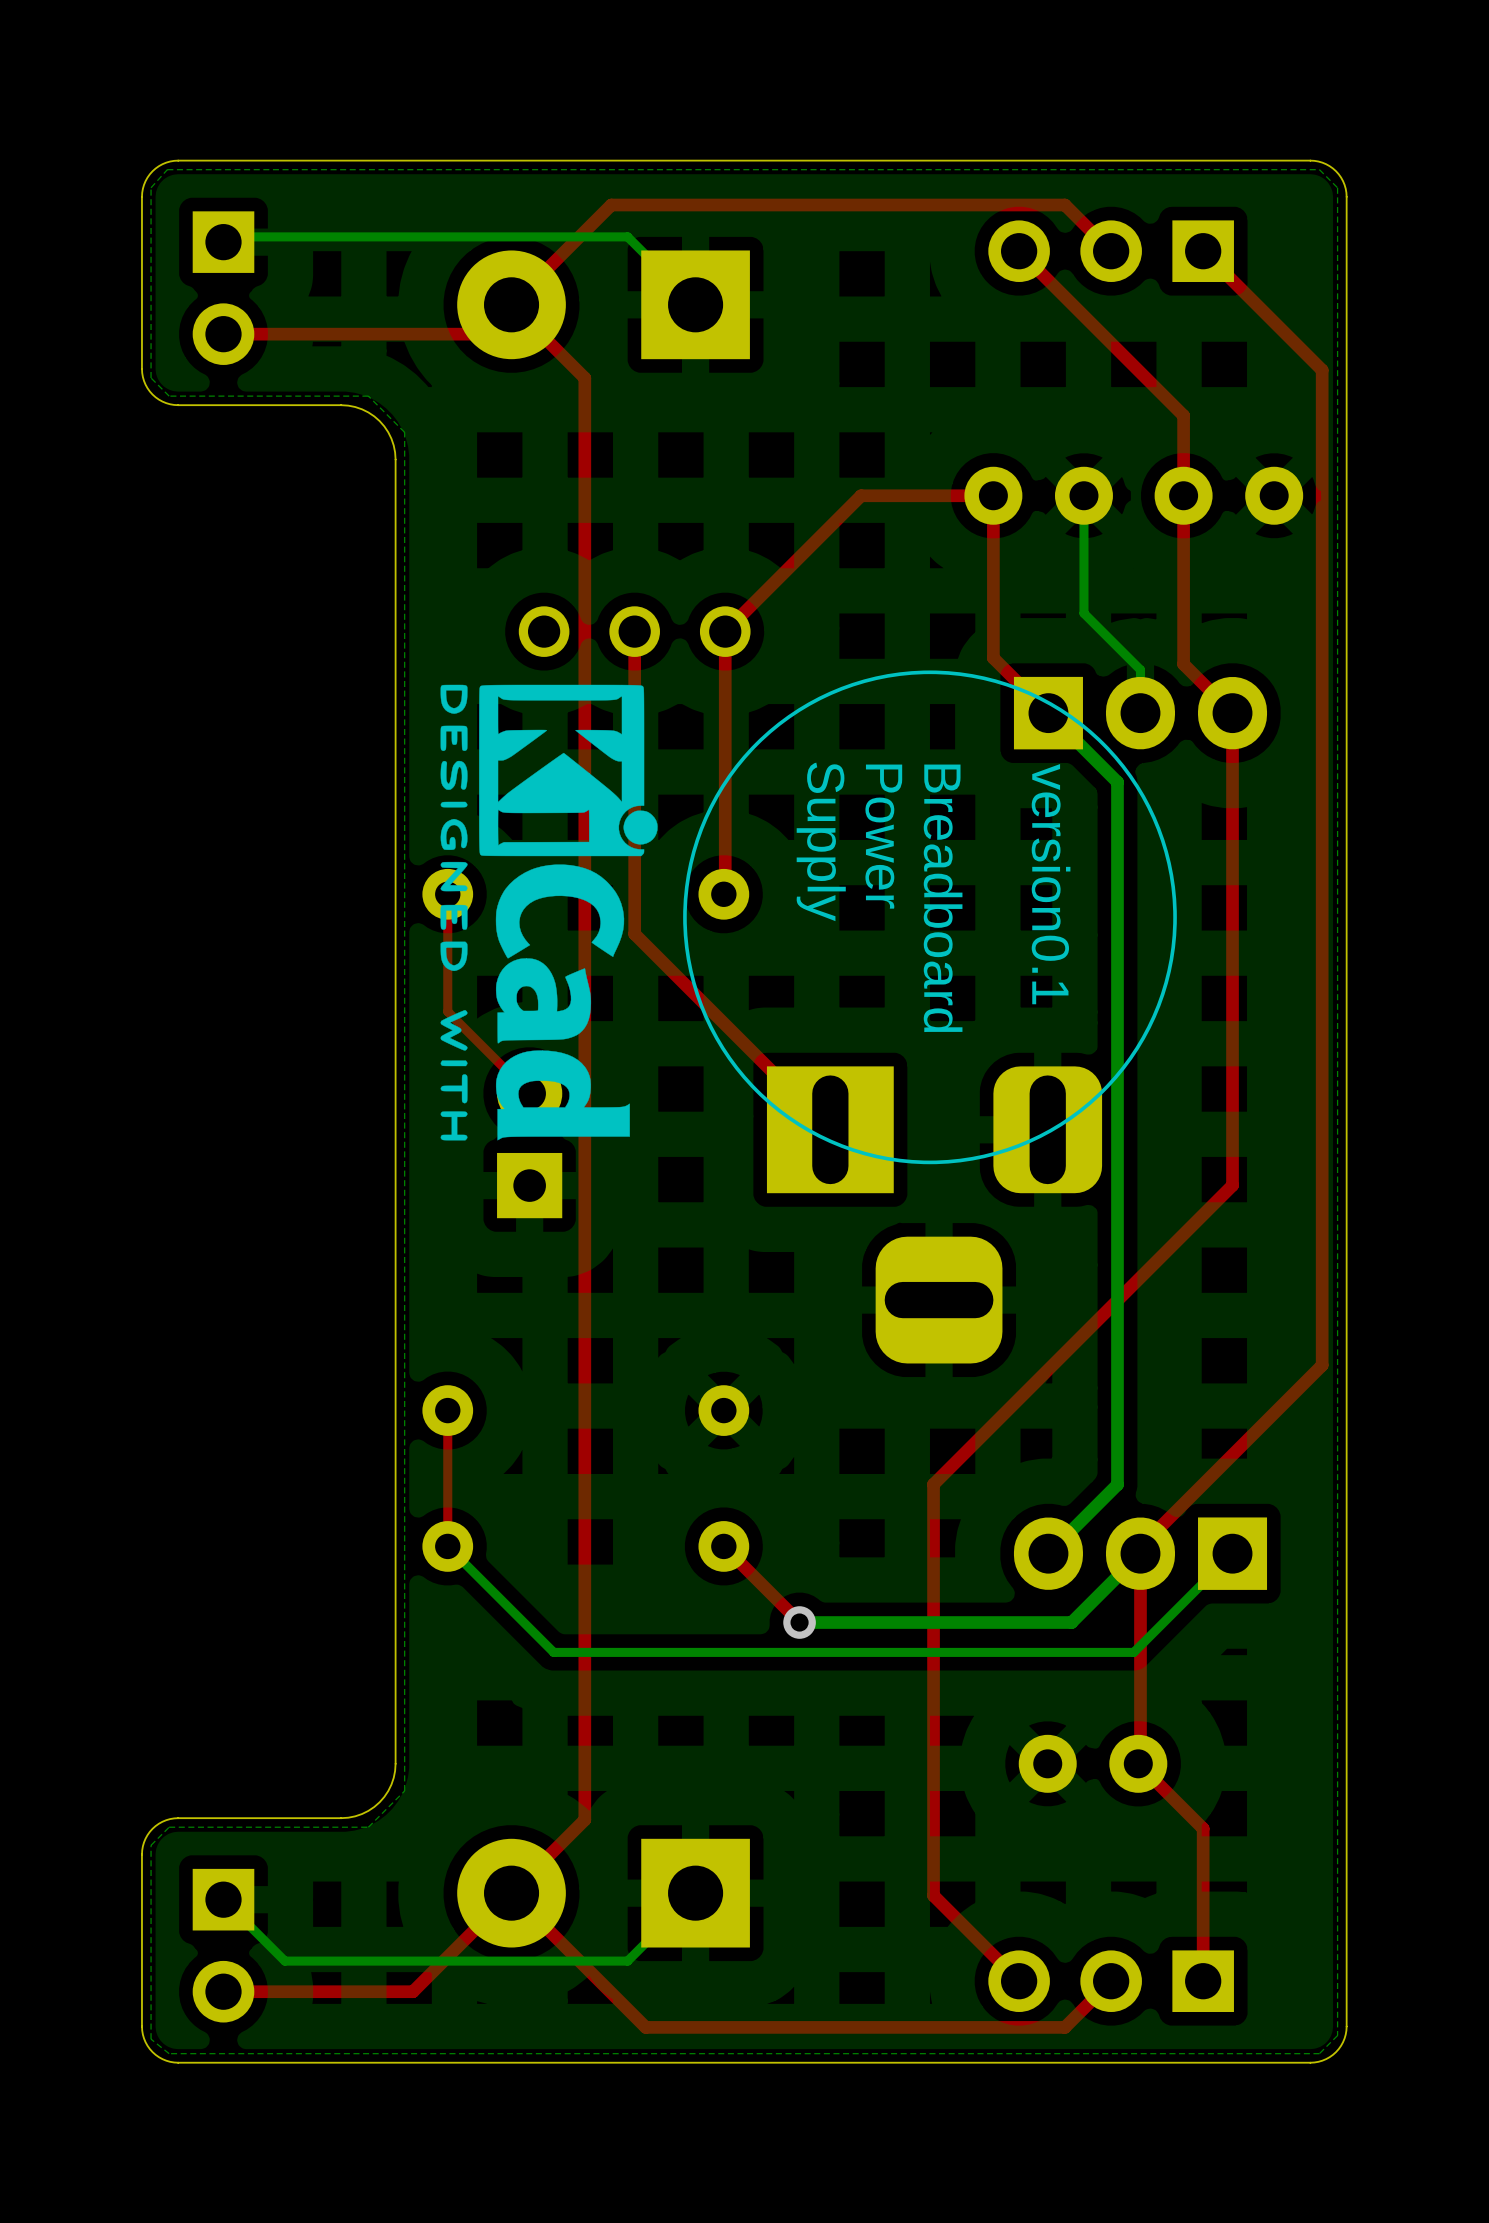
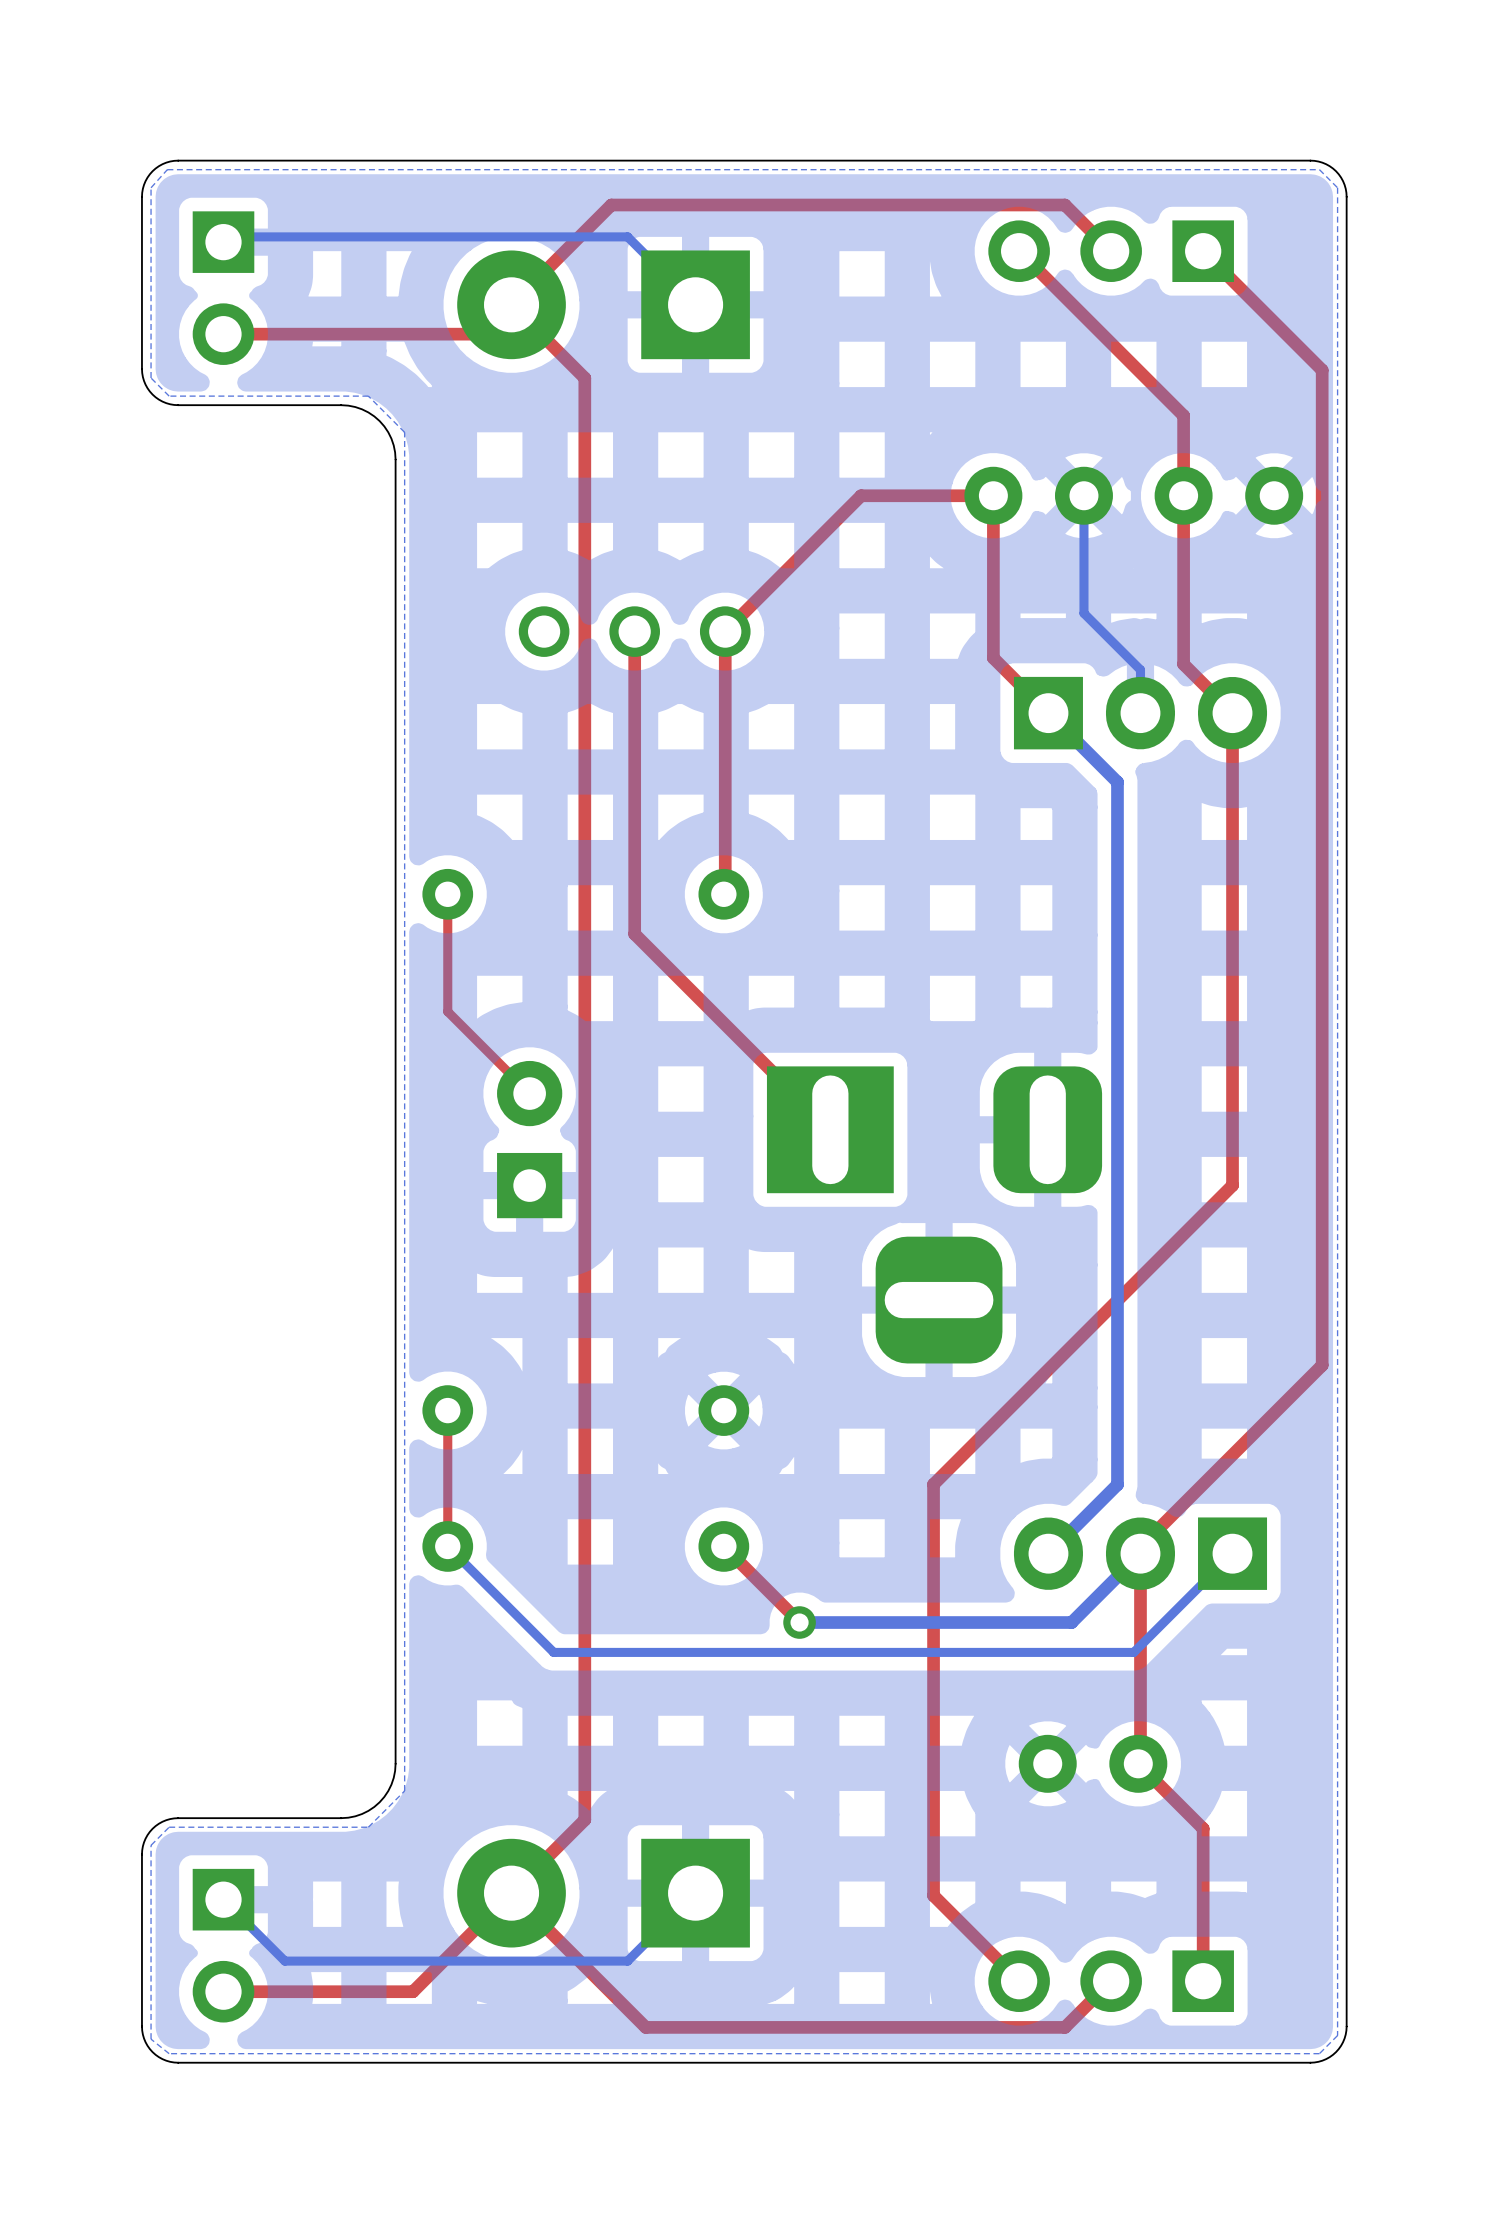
drawing: [440, 670, 1177, 1165] -> none
text: Power (883, 836) -> none
text: Supply (821, 841) -> none
text: version0.1 (1051, 884) -> none
text: Breadboard (943, 898) -> none

